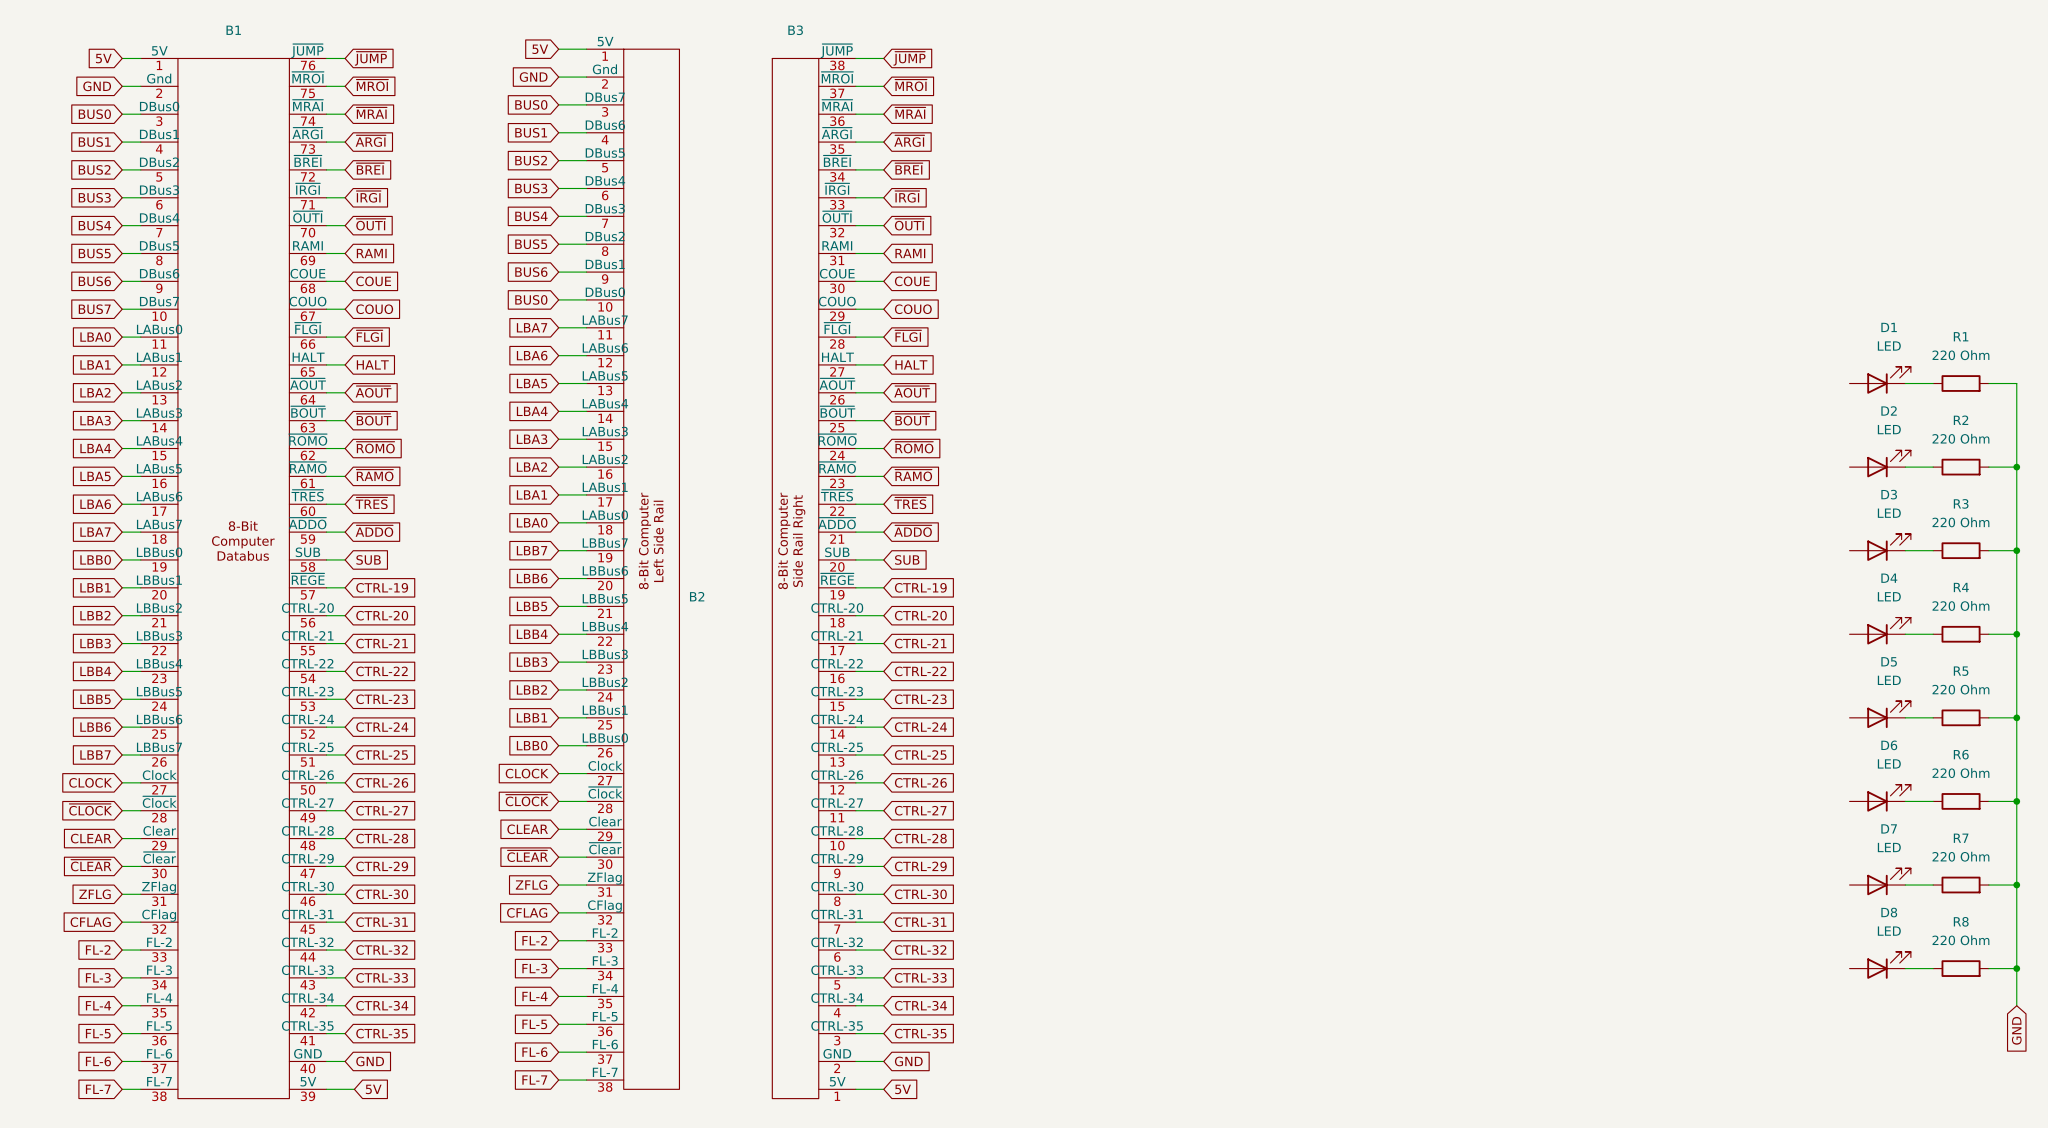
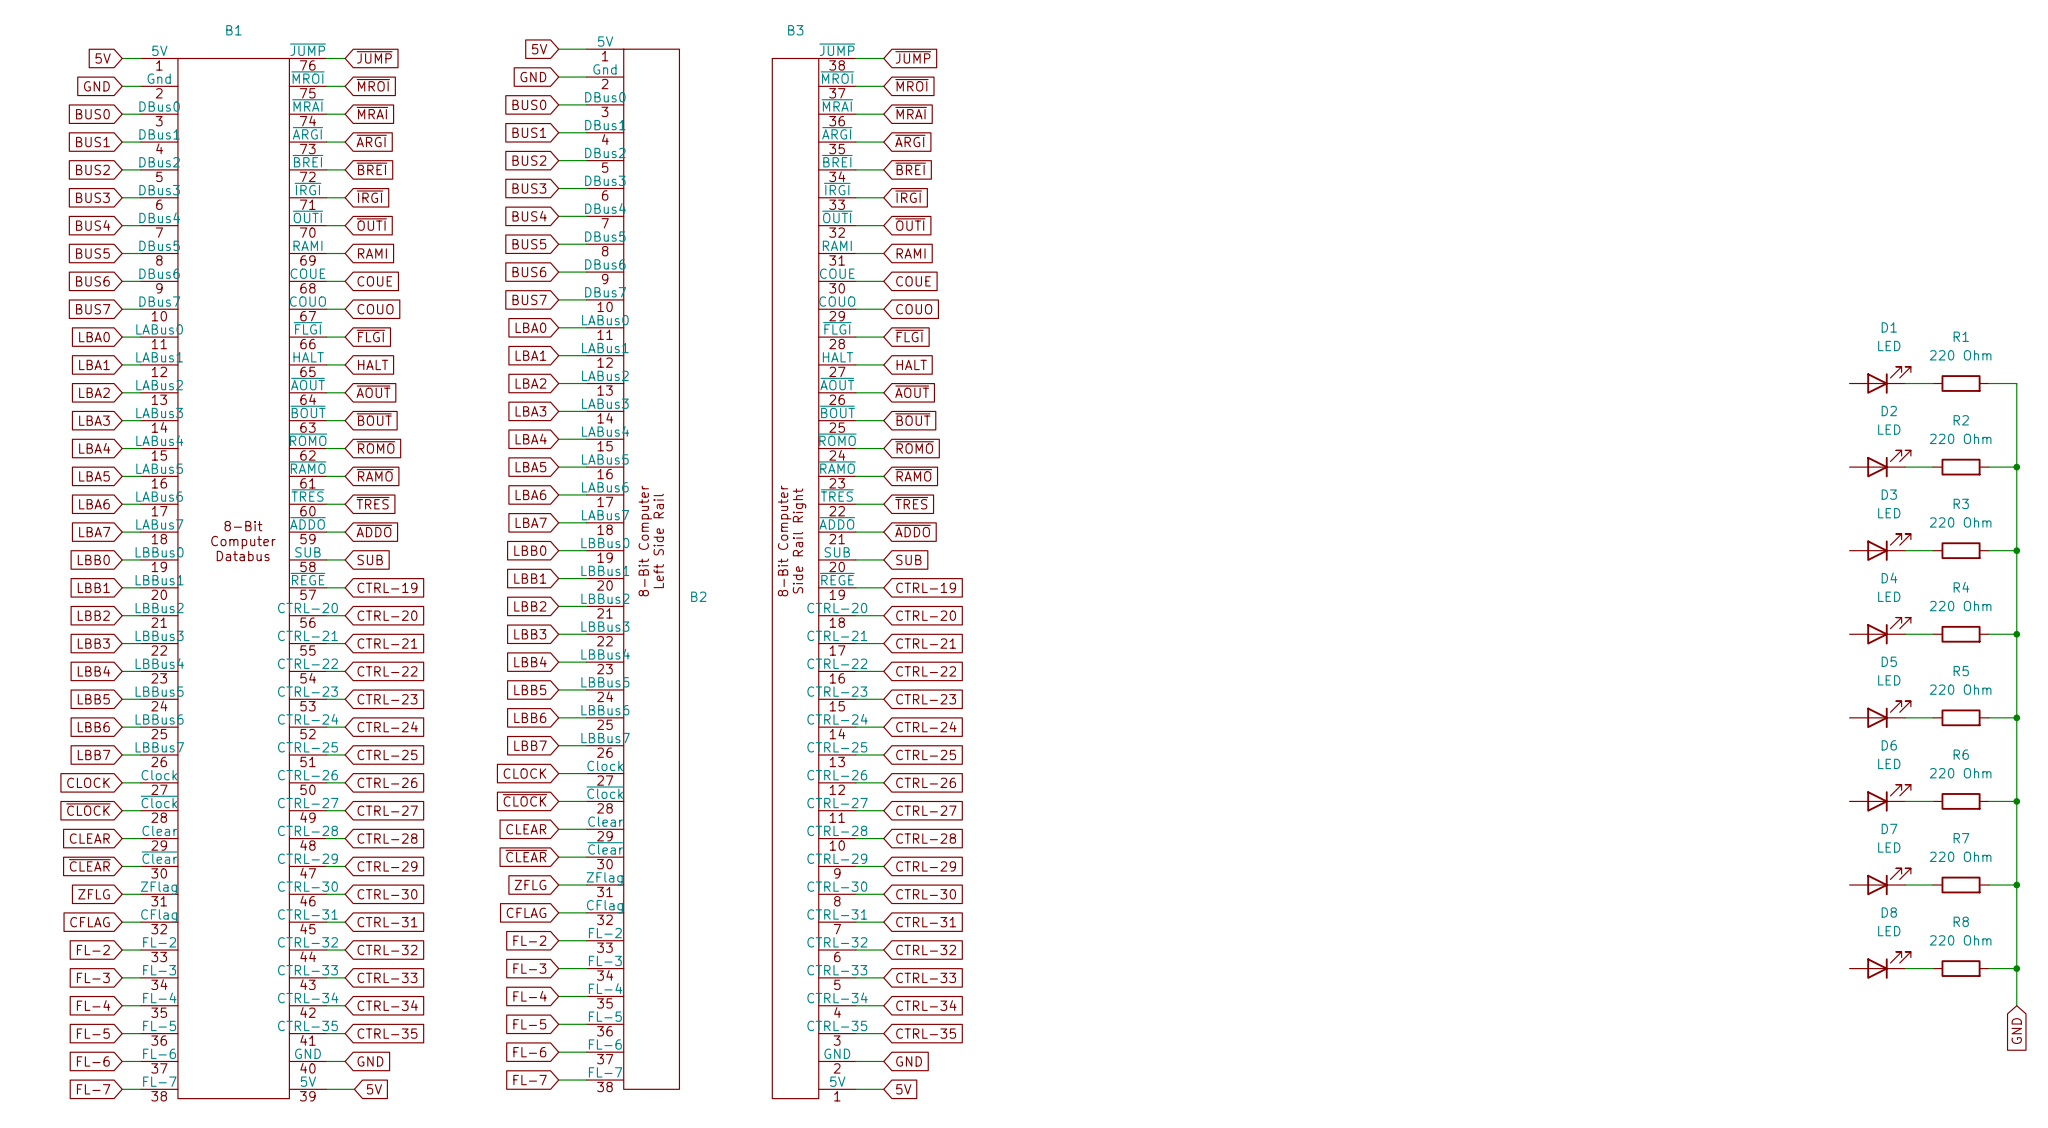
B2 symbol: [586, 49, 680, 1090] -> [586, 49, 680, 1090]
global label: BUS0 (531, 299) -> BUS7 (529, 299)
global label: LBA7 (532, 327) -> LBA0 (530, 327)
global label: LBA6 (532, 355) -> LBA1 (530, 355)
global label: LBA5 (532, 383) -> LBA2 (530, 383)
global label: LBA4 (532, 411) -> LBA3 (530, 411)
global label: LBA3 (532, 439) -> LBA4 (531, 439)
global label: LBA2 (531, 467) -> LBA5 (530, 467)
global label: LBA1 (531, 494) -> LBA6 (530, 494)
global label: LBA0 (532, 522) -> LBA7 (531, 522)
global label: LBB7 (532, 550) -> LBB0 (530, 550)
global label: LBB6 (532, 578) -> LBB1 (530, 578)
global label: LBB5 (531, 606) -> LBB2 (530, 606)
global label: LBB4 (532, 634) -> LBB3 (530, 634)
global label: LBB3 (532, 662) -> LBB4 (530, 661)
global label: LBB2 (531, 689) -> LBB5 (530, 689)
global label: LBB1 (531, 717) -> LBB6 (530, 717)
global label: LBB0 (532, 745) -> LBB7 (530, 745)

